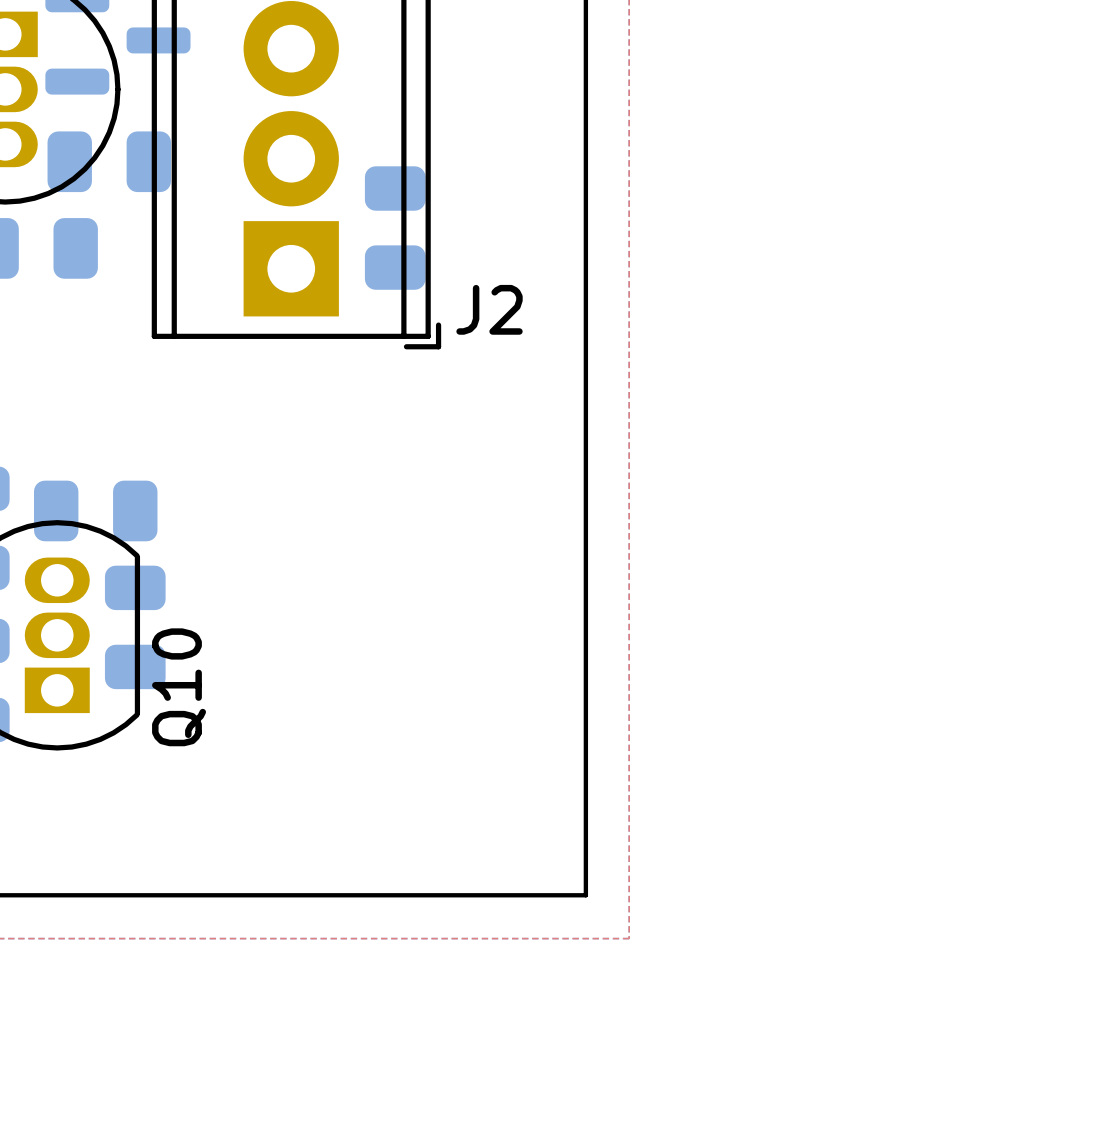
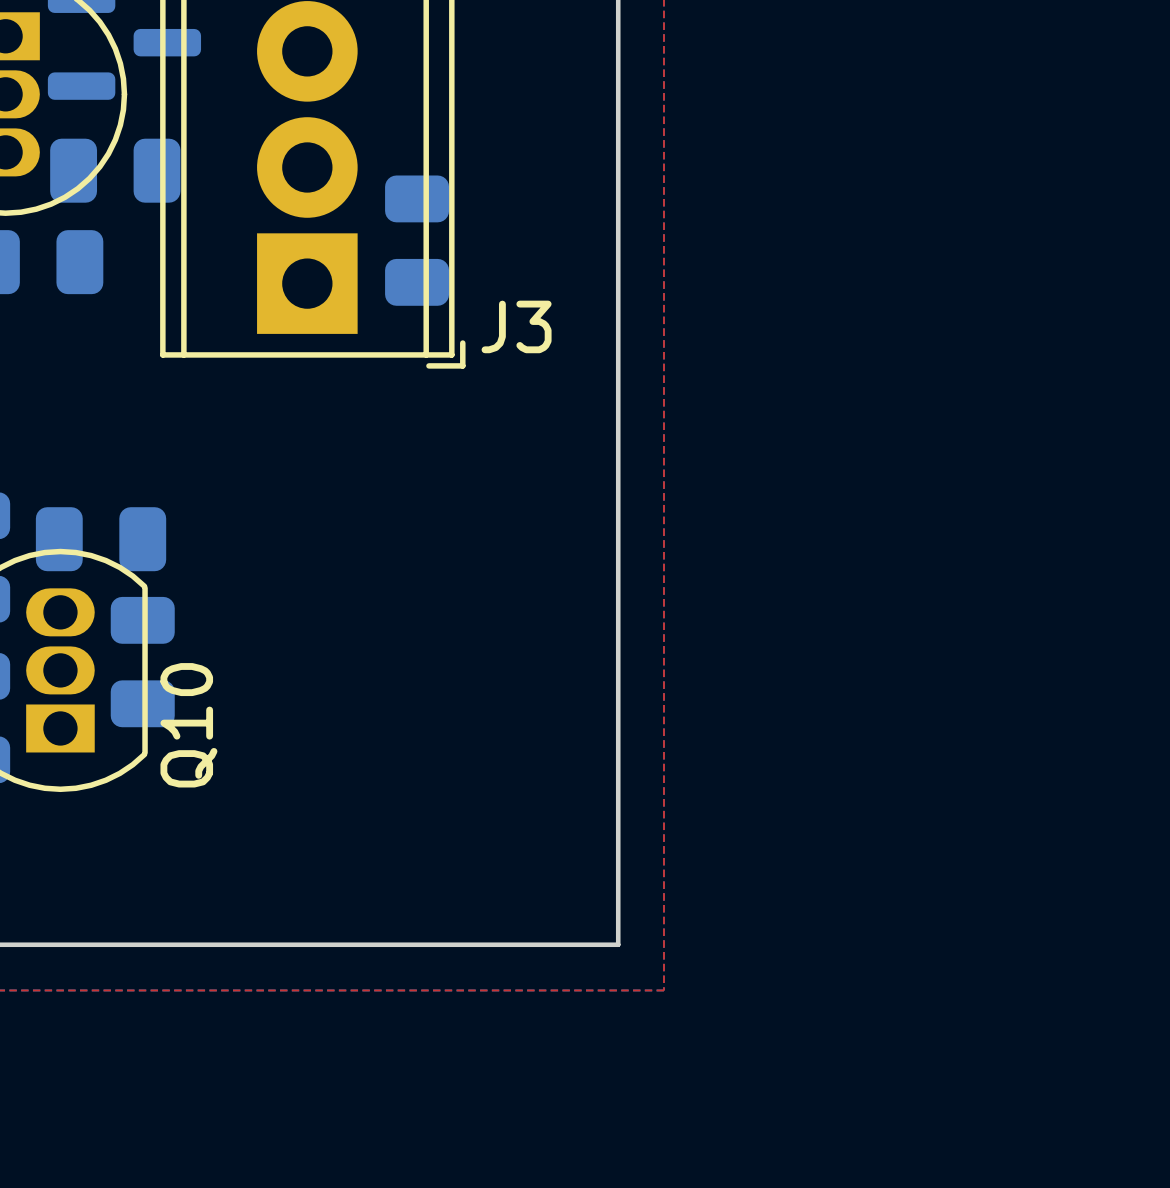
J2 name: J2 (489, 309) -> J3 (516, 326)

